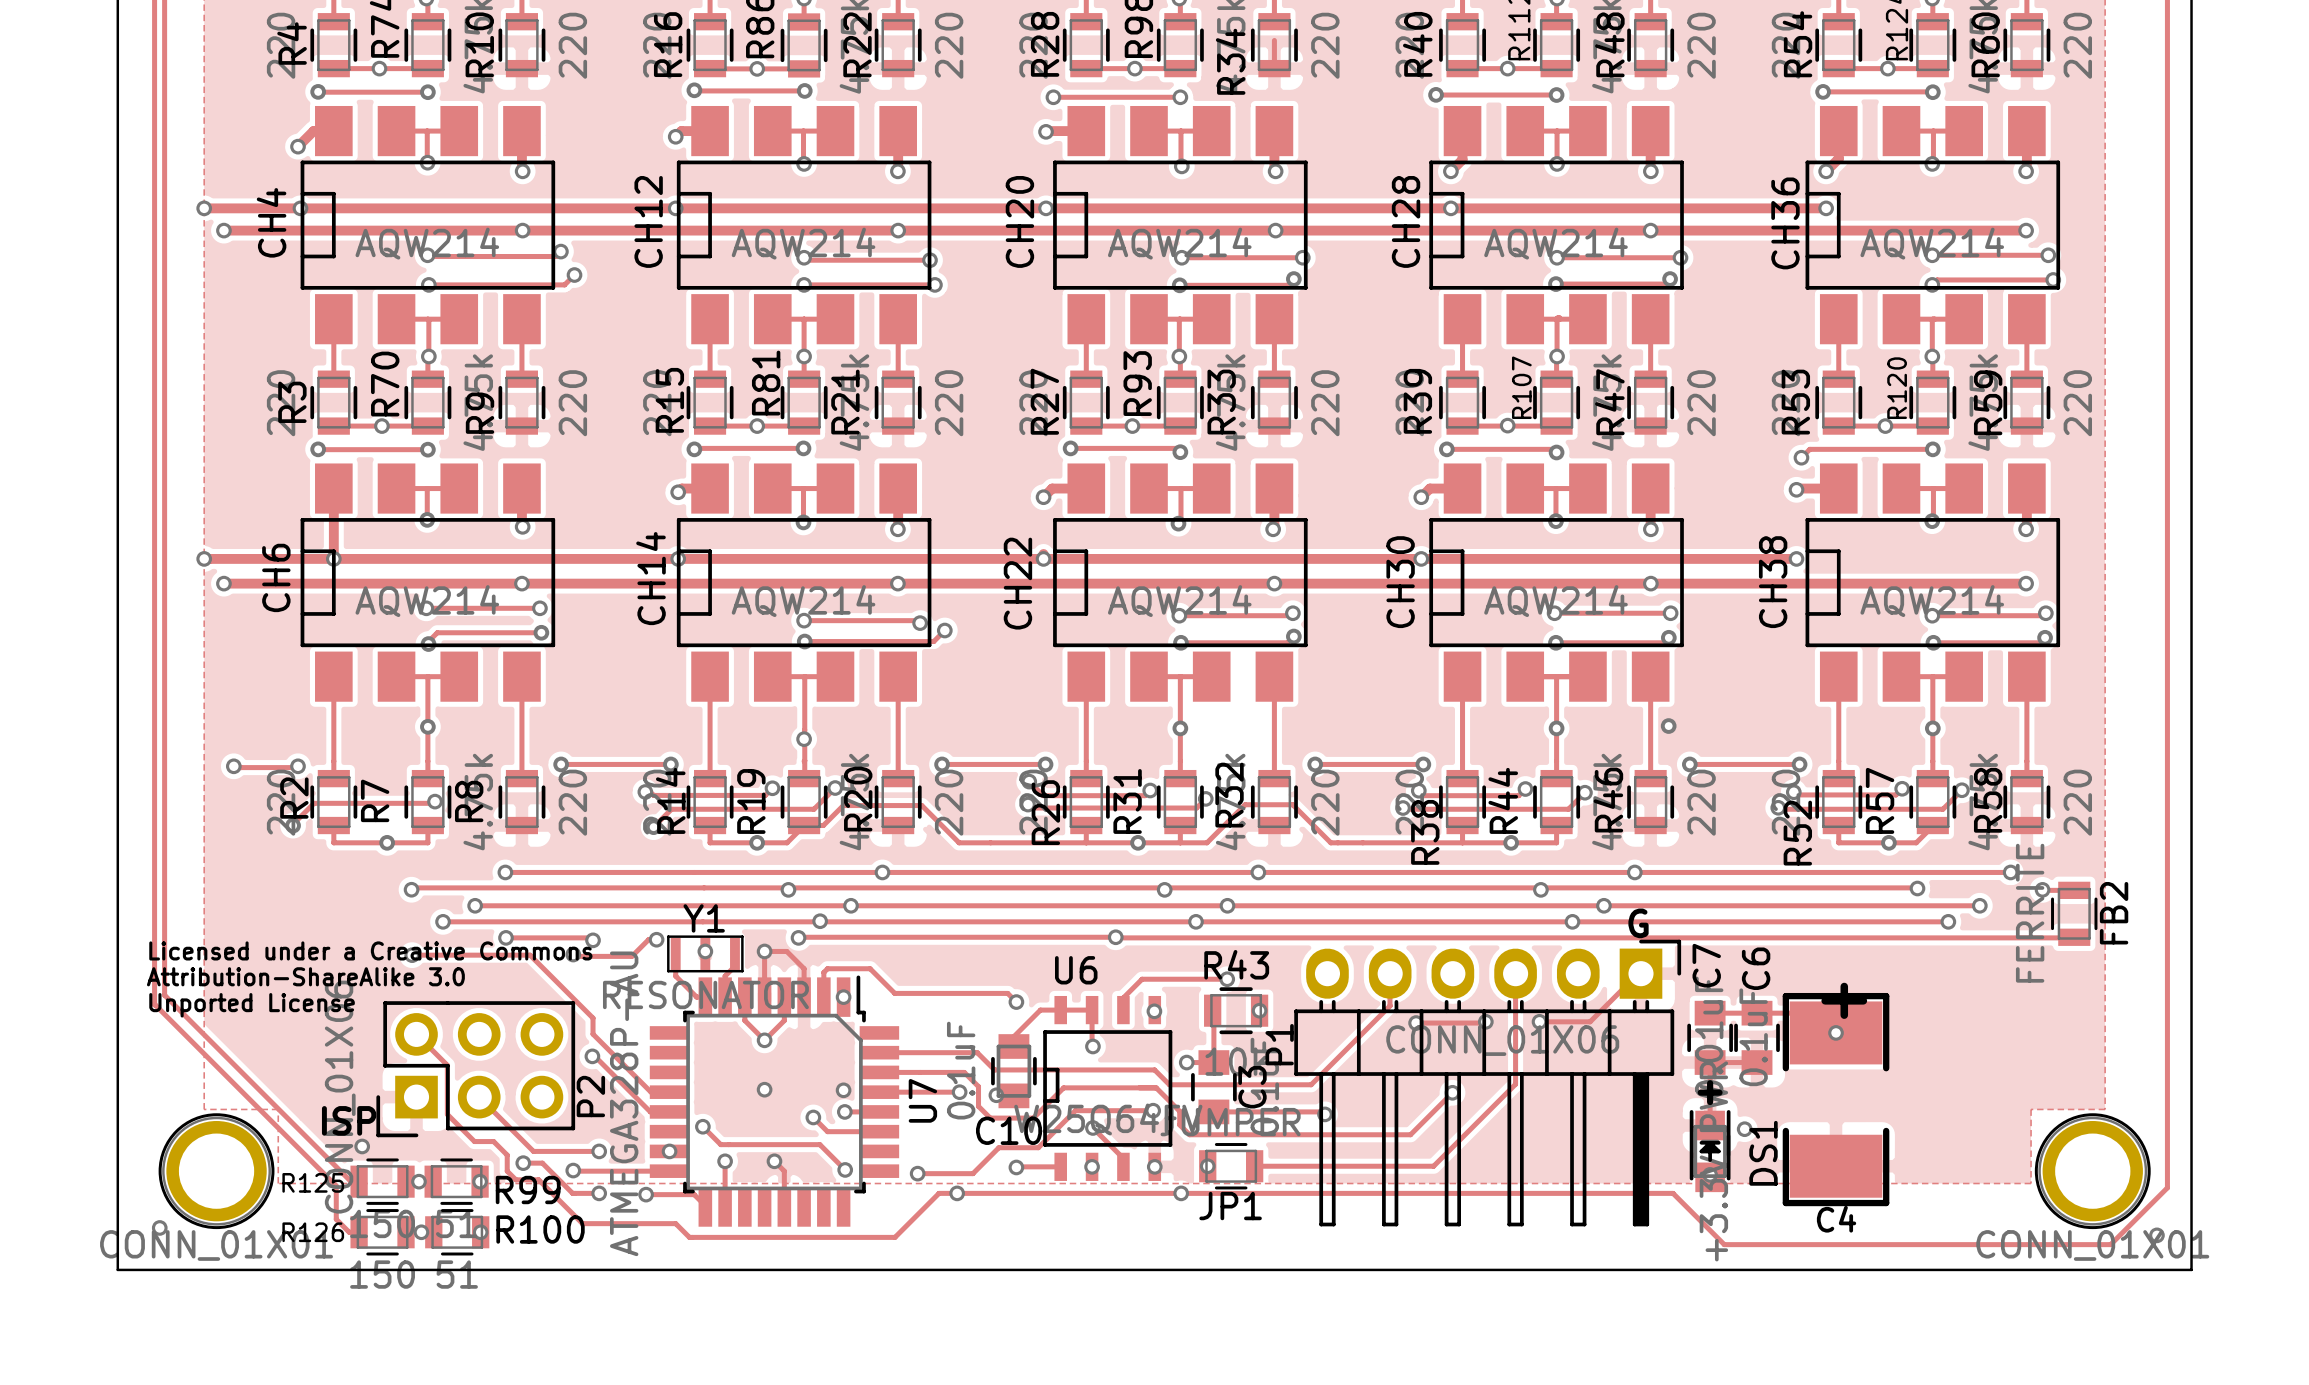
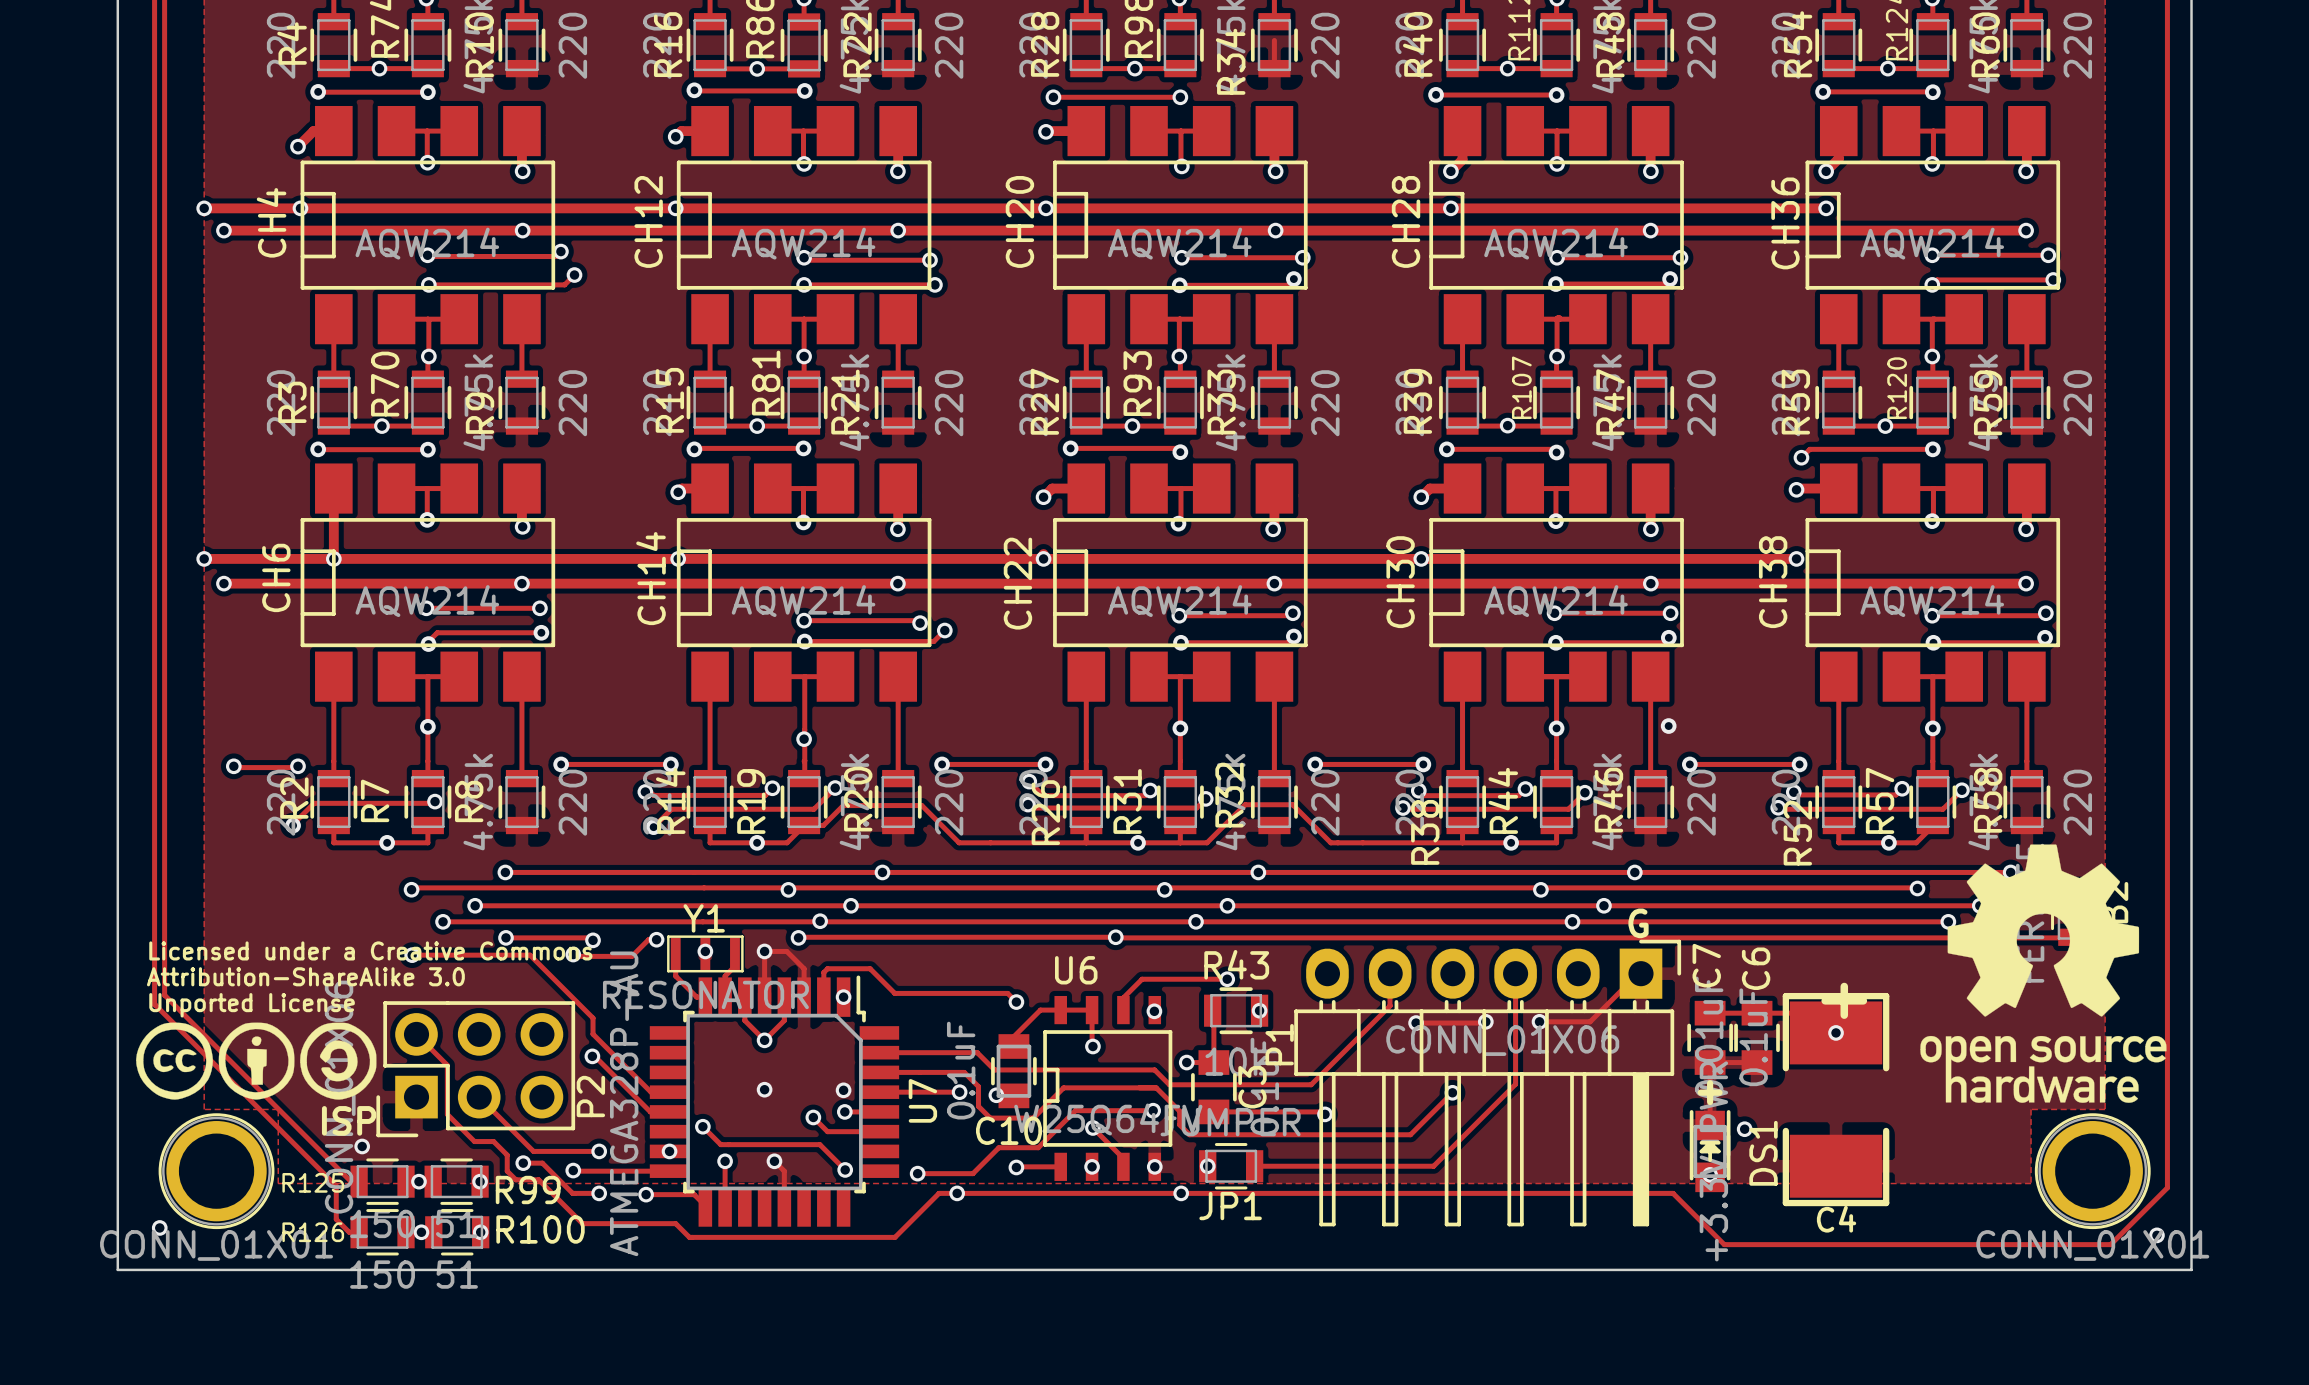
drawing: none -> [1920, 844, 2167, 1103]
drawing: none -> [136, 1022, 377, 1100]

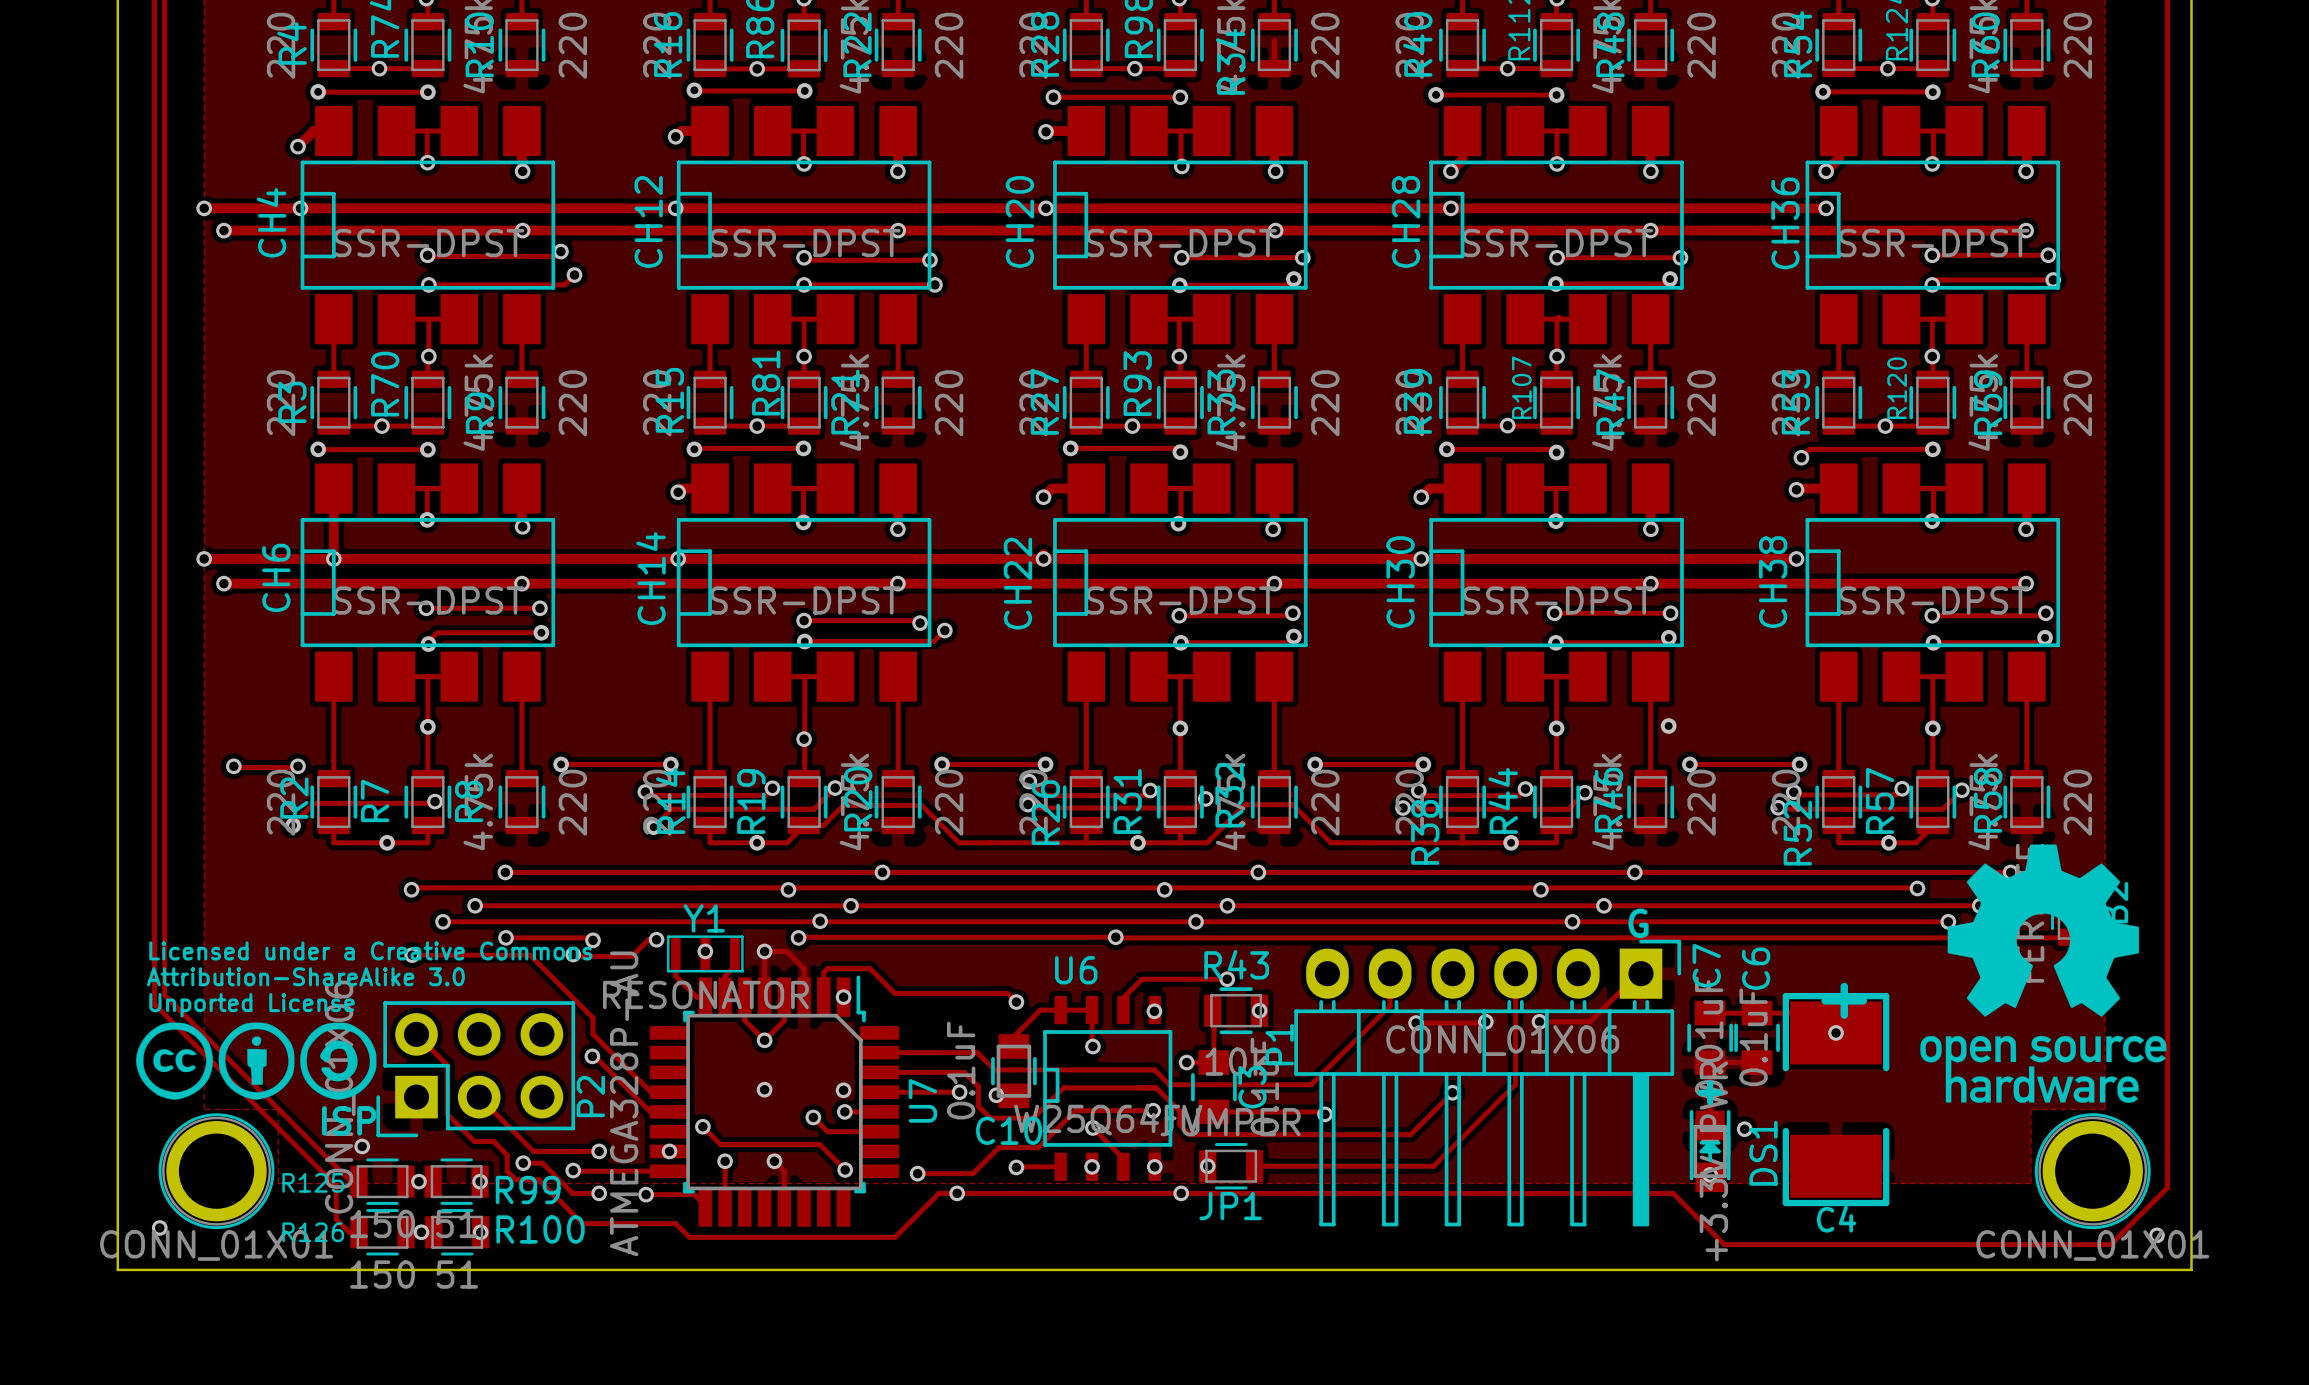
CH4 value: AQW214 (427, 243) -> SSR-DPST (429, 243)
CH12 value: AQW214 (803, 243) -> SSR-DPST (805, 243)
CH20 value: AQW214 (1179, 243) -> SSR-DPST (1181, 243)
CH28 value: AQW214 (1556, 243) -> SSR-DPST (1557, 243)
CH36 value: AQW214 (1932, 243) -> SSR-DPST (1934, 243)
CH6 value: AQW214 (427, 601) -> SSR-DPST (429, 600)
CH14 value: AQW214 (803, 601) -> SSR-DPST (805, 600)
CH22 value: AQW214 (1179, 601) -> SSR-DPST (1181, 600)
CH30 value: AQW214 (1556, 601) -> SSR-DPST (1557, 600)
CH38 value: AQW214 (1932, 601) -> SSR-DPST (1934, 600)

